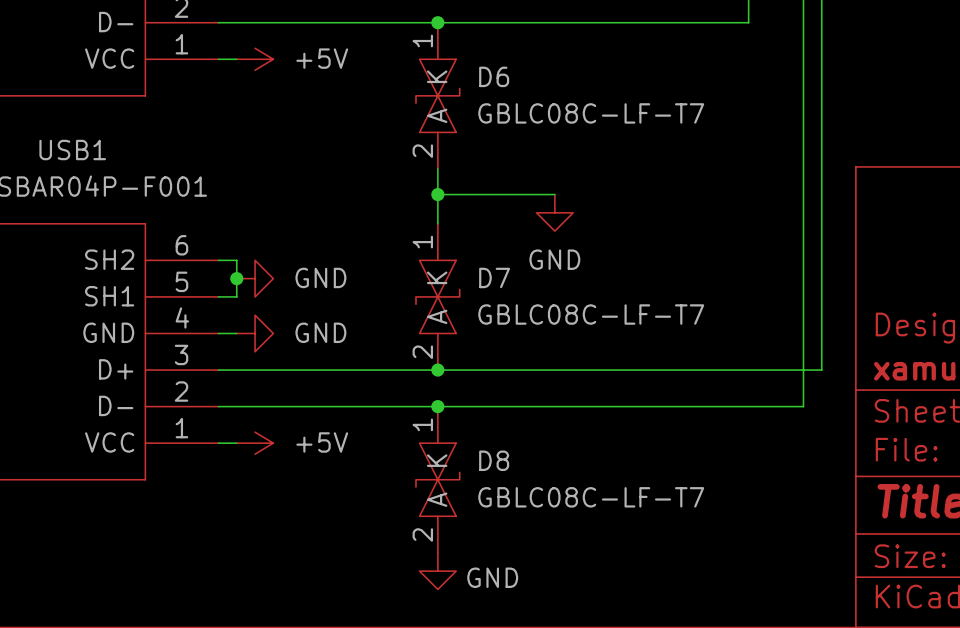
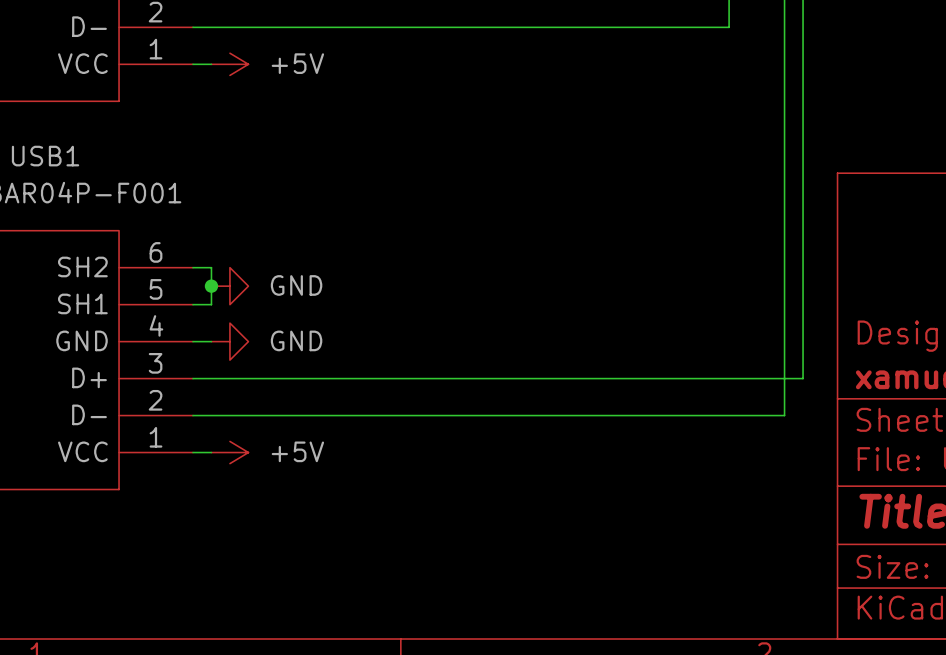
junction: (437, 22) -> none
D6: GBLC08C-LF-T7 (437, 95) -> none
wire: (437, 168) (437, 223) -> none
wire: (437, 194) (554, 194) -> none
junction: (437, 194) -> none
power symbol: GND (554, 212) -> none
D7: GBLC08C-LF-T7 (437, 296) -> none
junction: (437, 370) -> none
junction: (437, 406) -> none
D8: GBLC08C-LF-T7 (437, 479) -> none
power symbol: GND (437, 571) -> none

